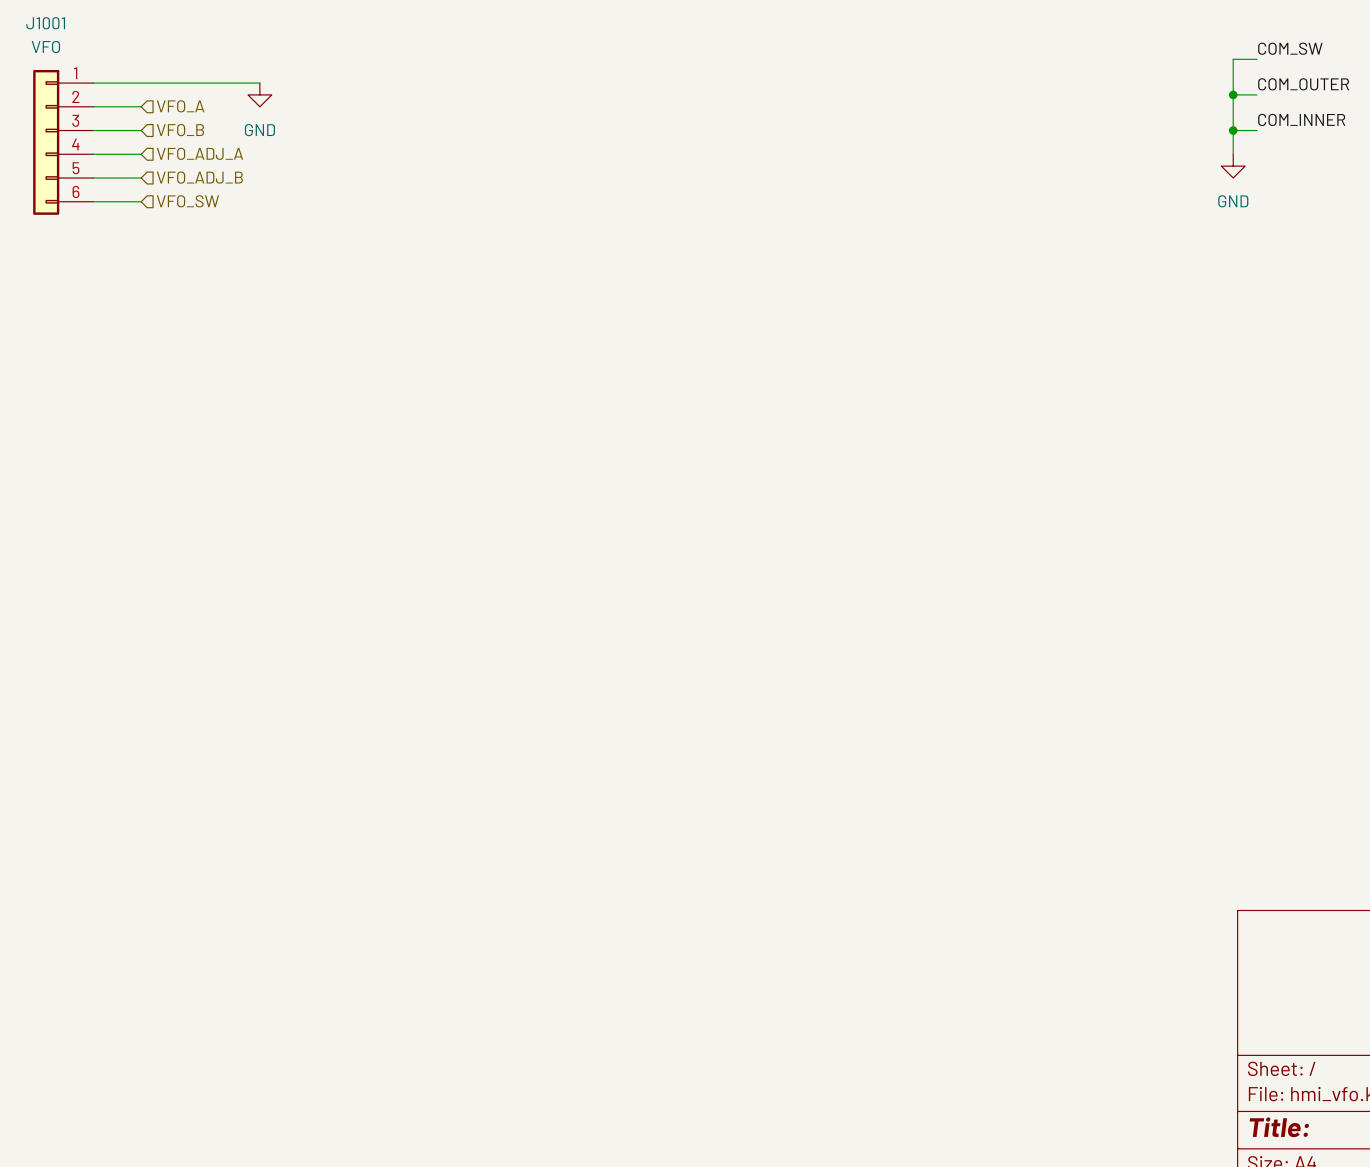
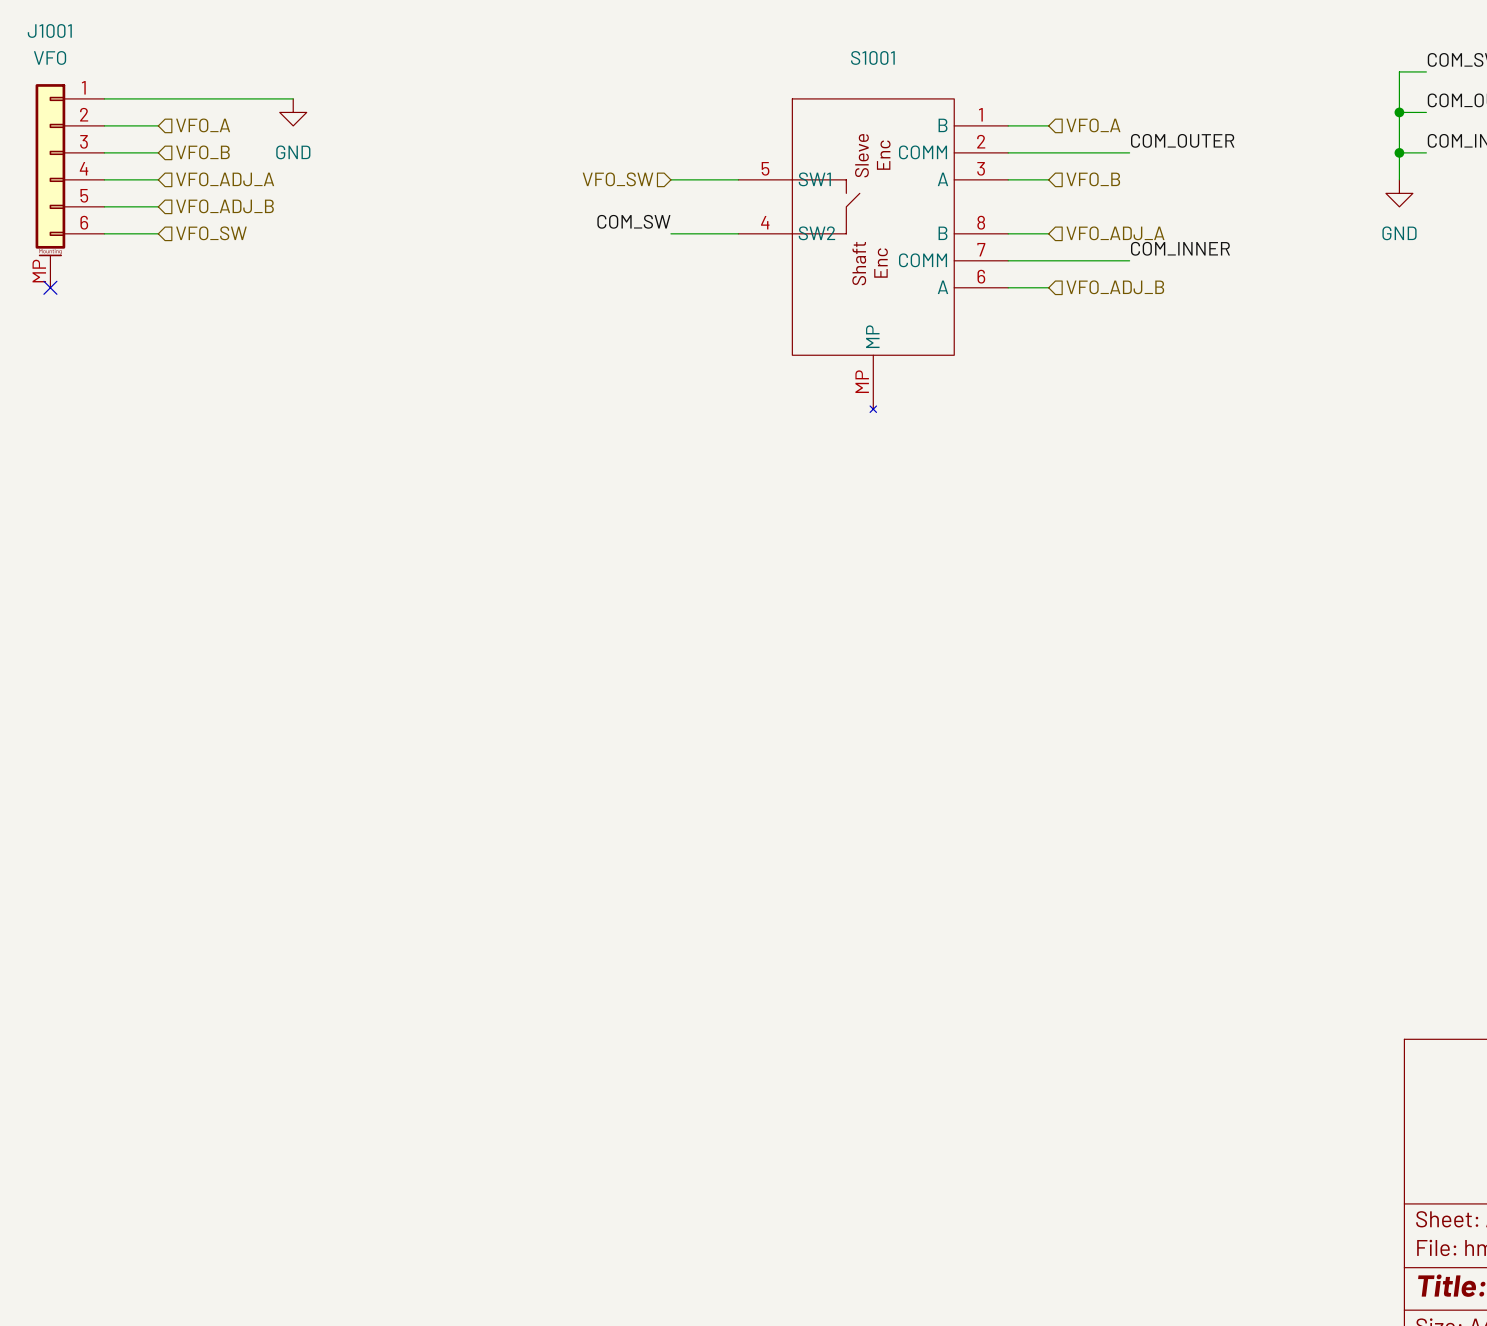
J1001 symbol: [33, 70, 94, 215] -> [35, 84, 105, 288]
wire: none -> (1008, 125) (1048, 125)
hierarchical label: none -> VFO_A (1093, 125)
label: none -> COM_OUTER (1182, 140)
wire: none -> (1008, 152) (1129, 152)
hierarchical label: none -> VFO_SW (618, 179)
hierarchical label: none -> VFO_B (1093, 179)
wire: none -> (670, 179) (738, 179)
wire: none -> (1008, 179) (1048, 179)
label: none -> COM_SW (633, 221)
wire: none -> (670, 233) (738, 233)
wire: none -> (1008, 233) (1048, 233)
hierarchical label: none -> VFO_ADJ_A (1115, 233)
label: none -> COM_INNER (1180, 248)
S1001: none -> (873, 255)
wire: none -> (1008, 260) (1129, 260)
hierarchical label: none -> VFO_ADJ_B (1115, 287)
no-connect mark: none -> (50, 287)
wire: none -> (1008, 287) (1048, 287)

